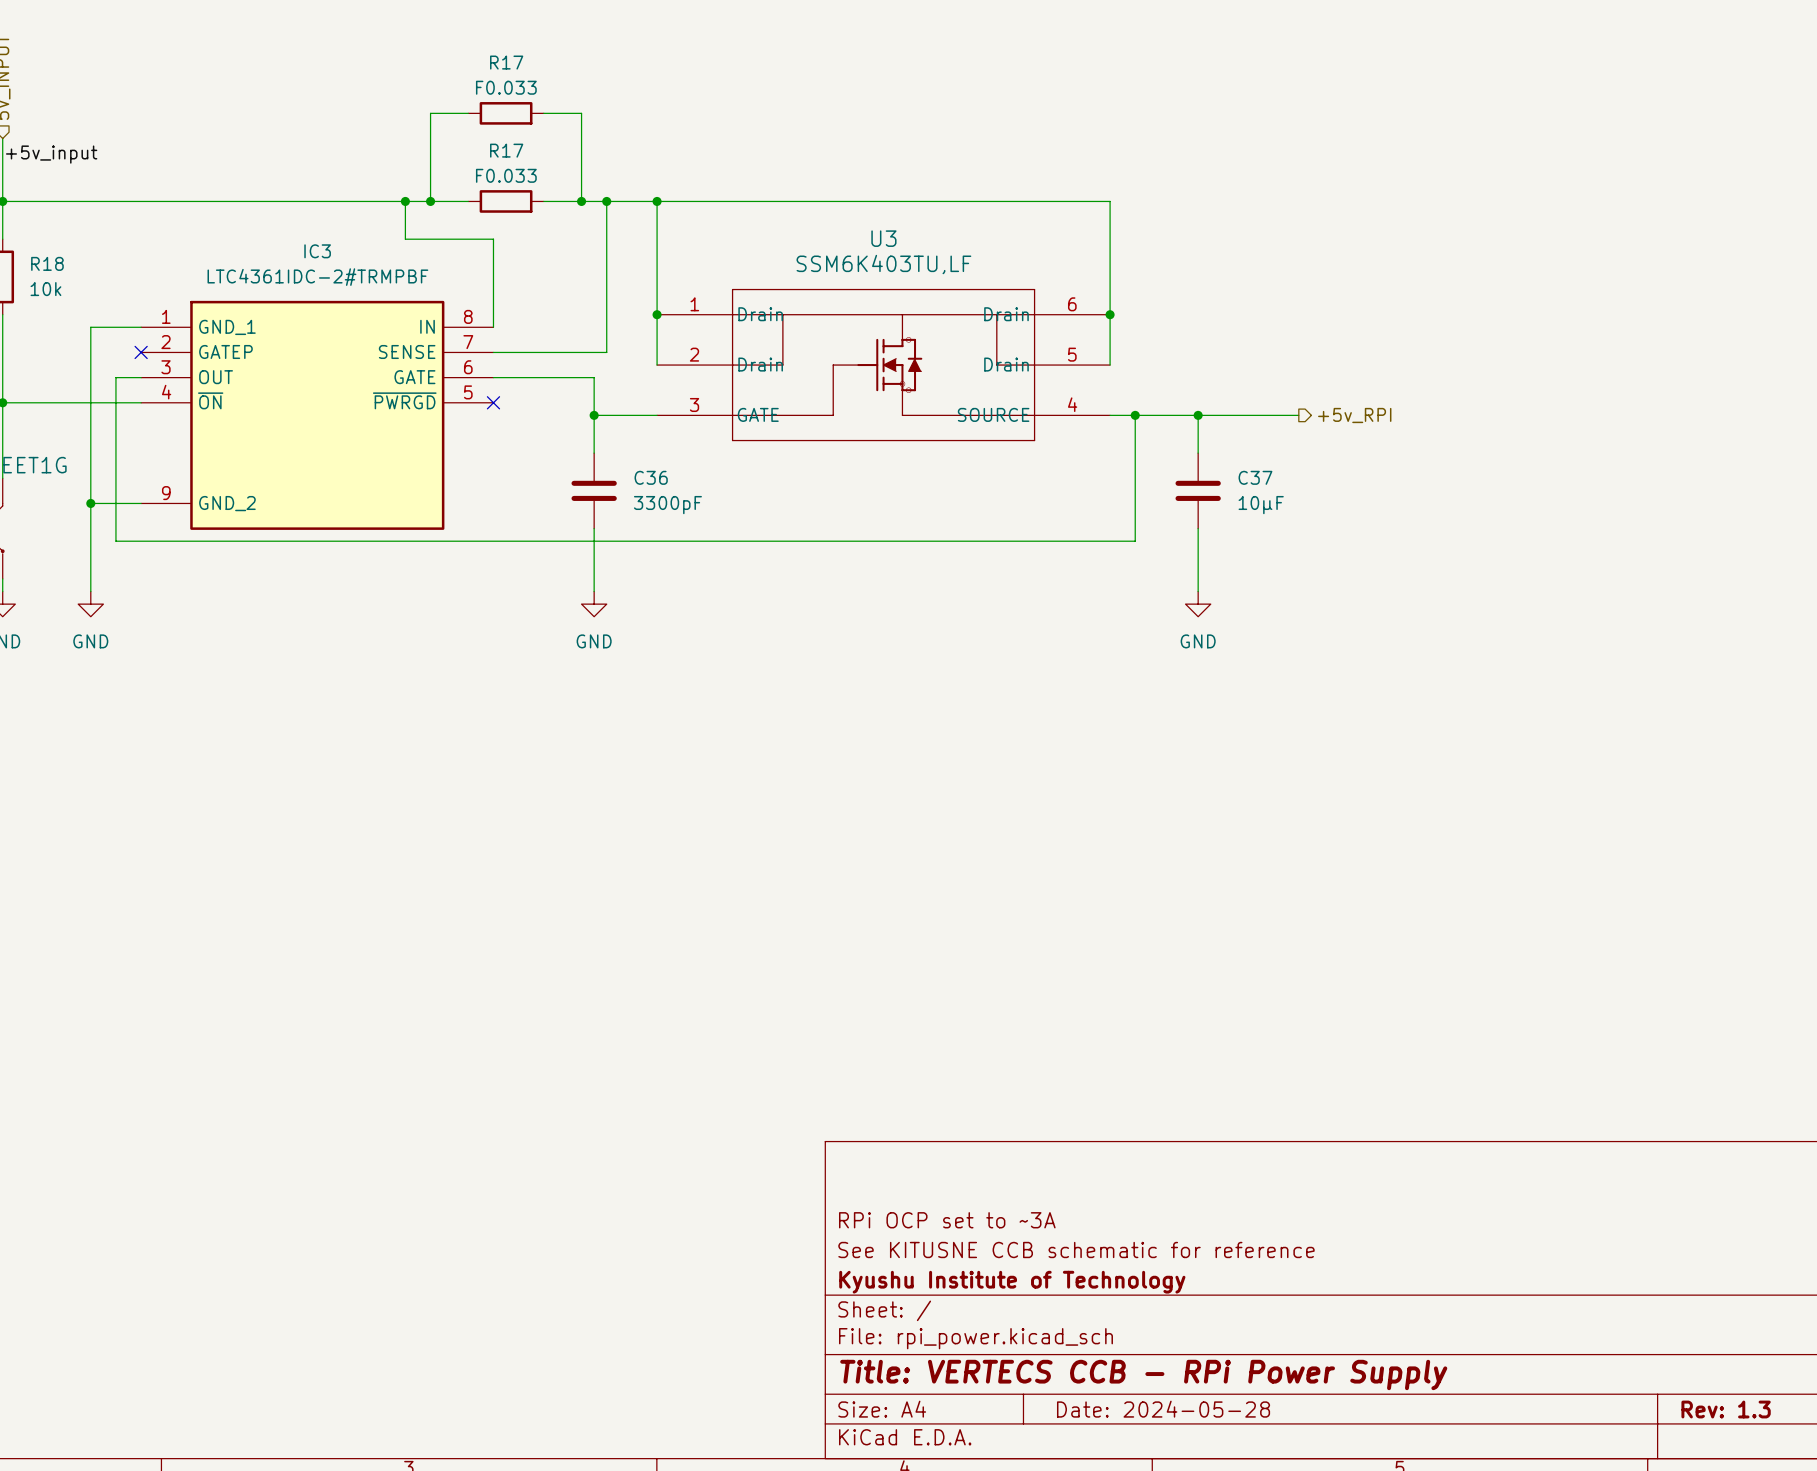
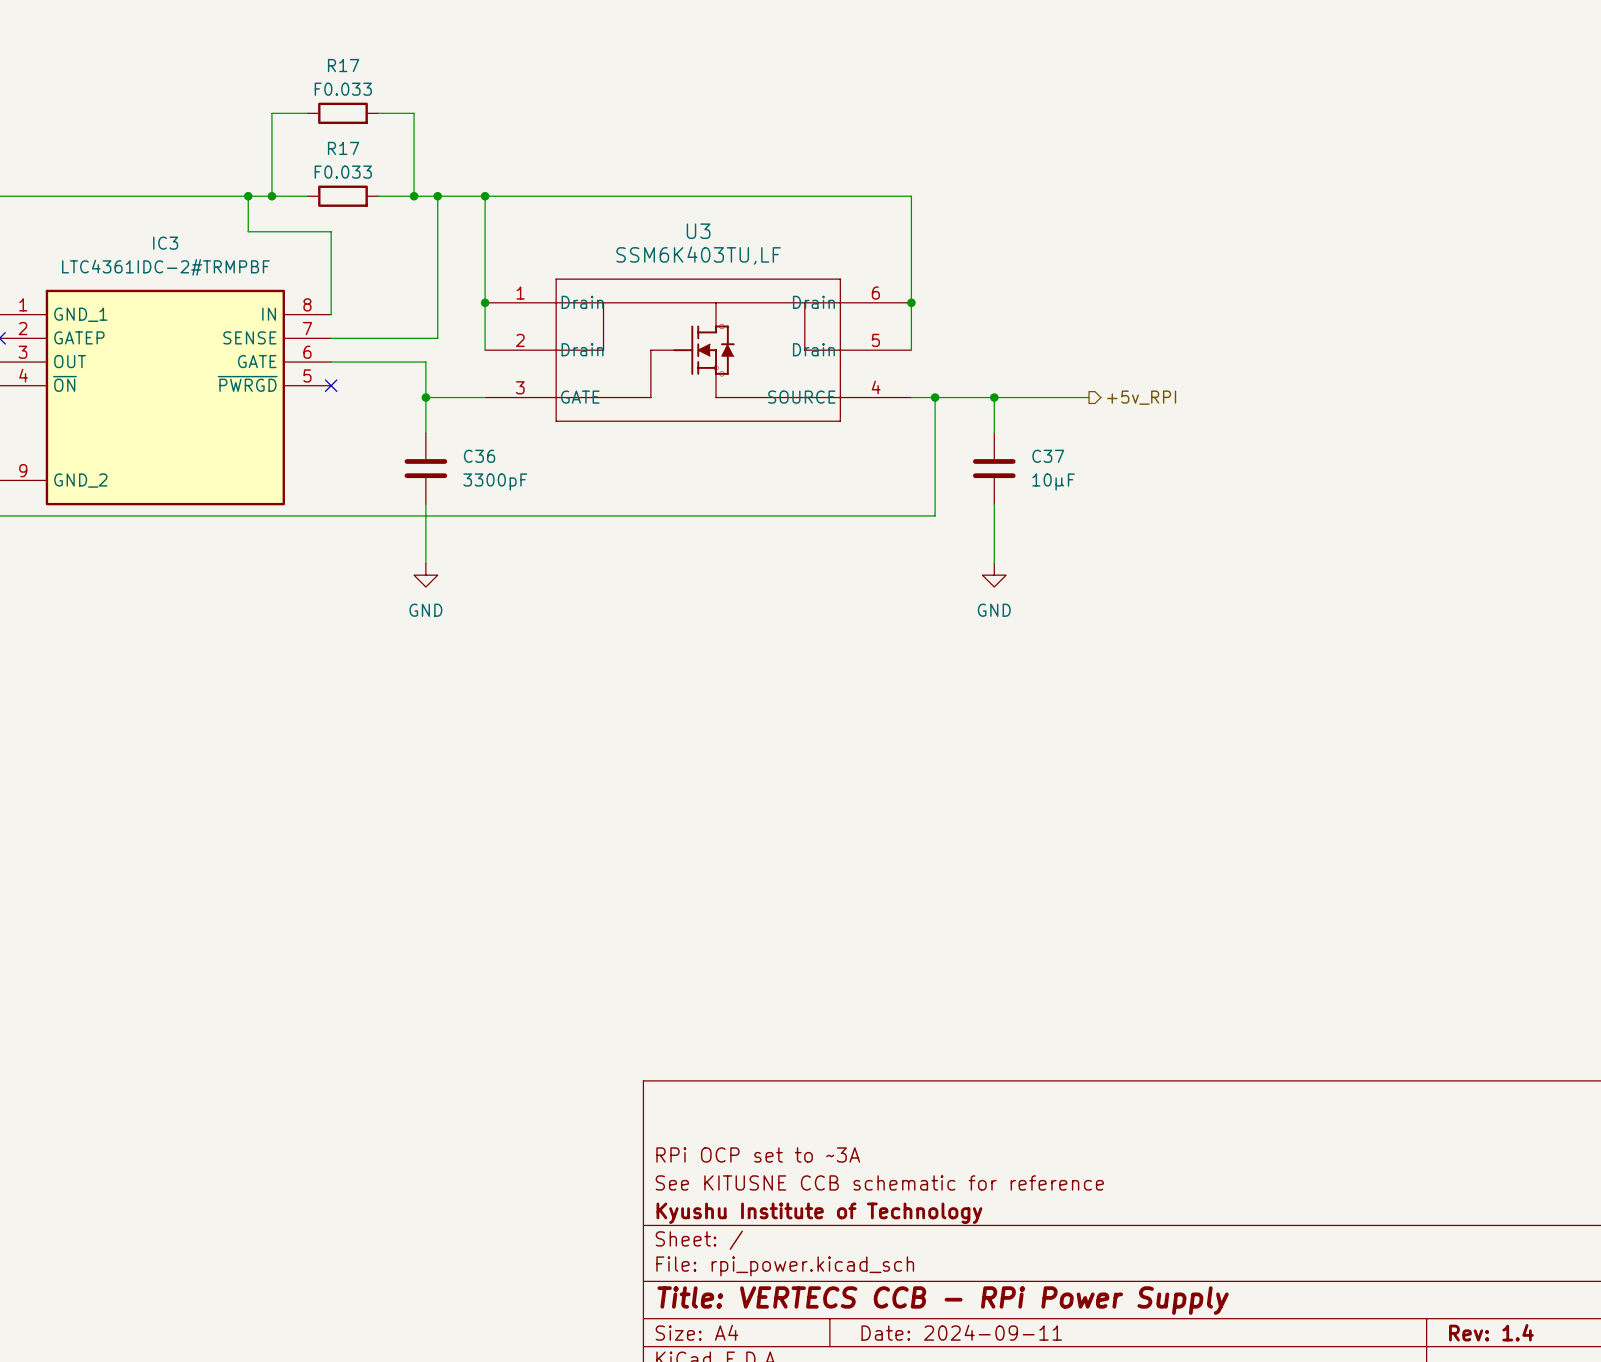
title block: Date: 2024-05-28 (1163, 1409) -> Date: 2024-09-11 (961, 1332)
title block: Rev: 1.3 (1726, 1409) -> Rev: 1.4 (1491, 1332)

